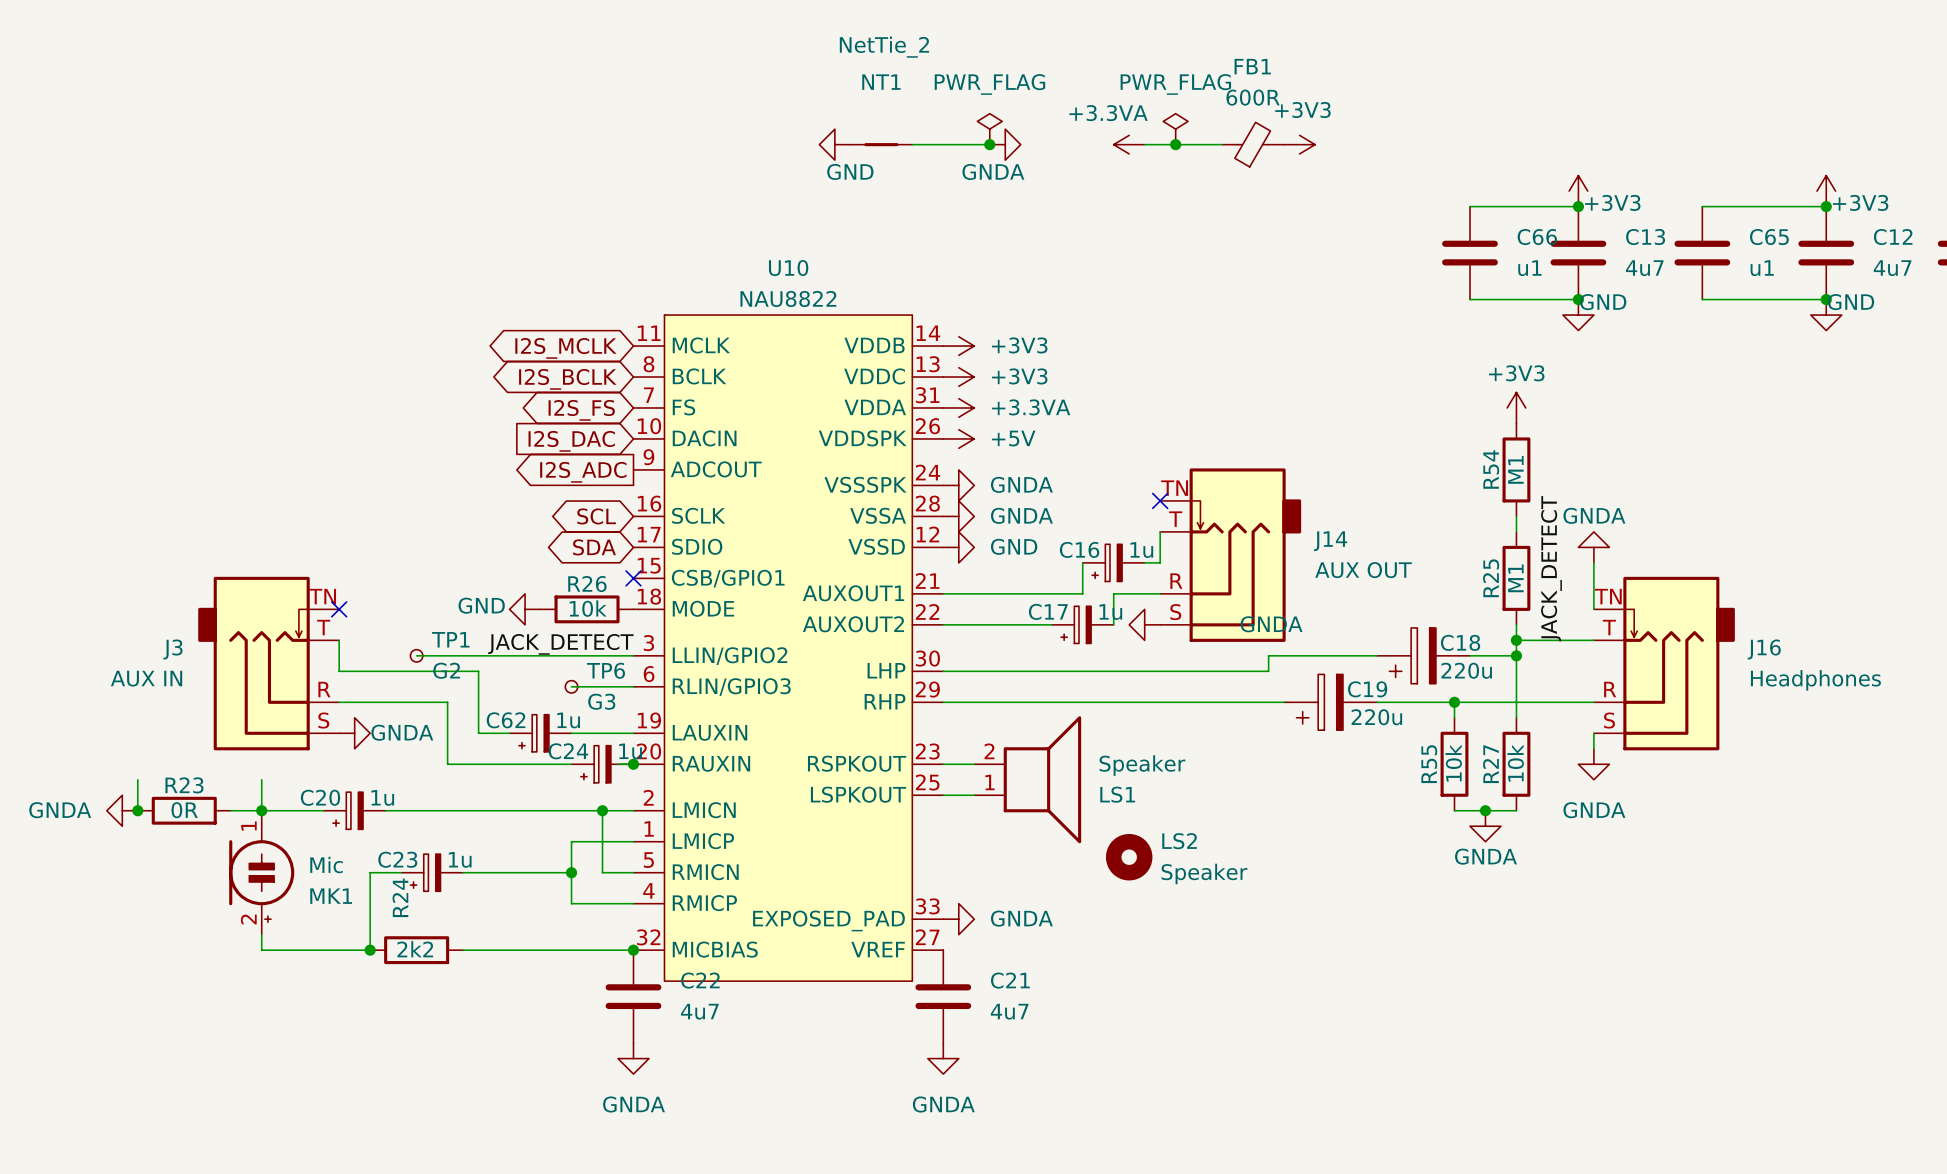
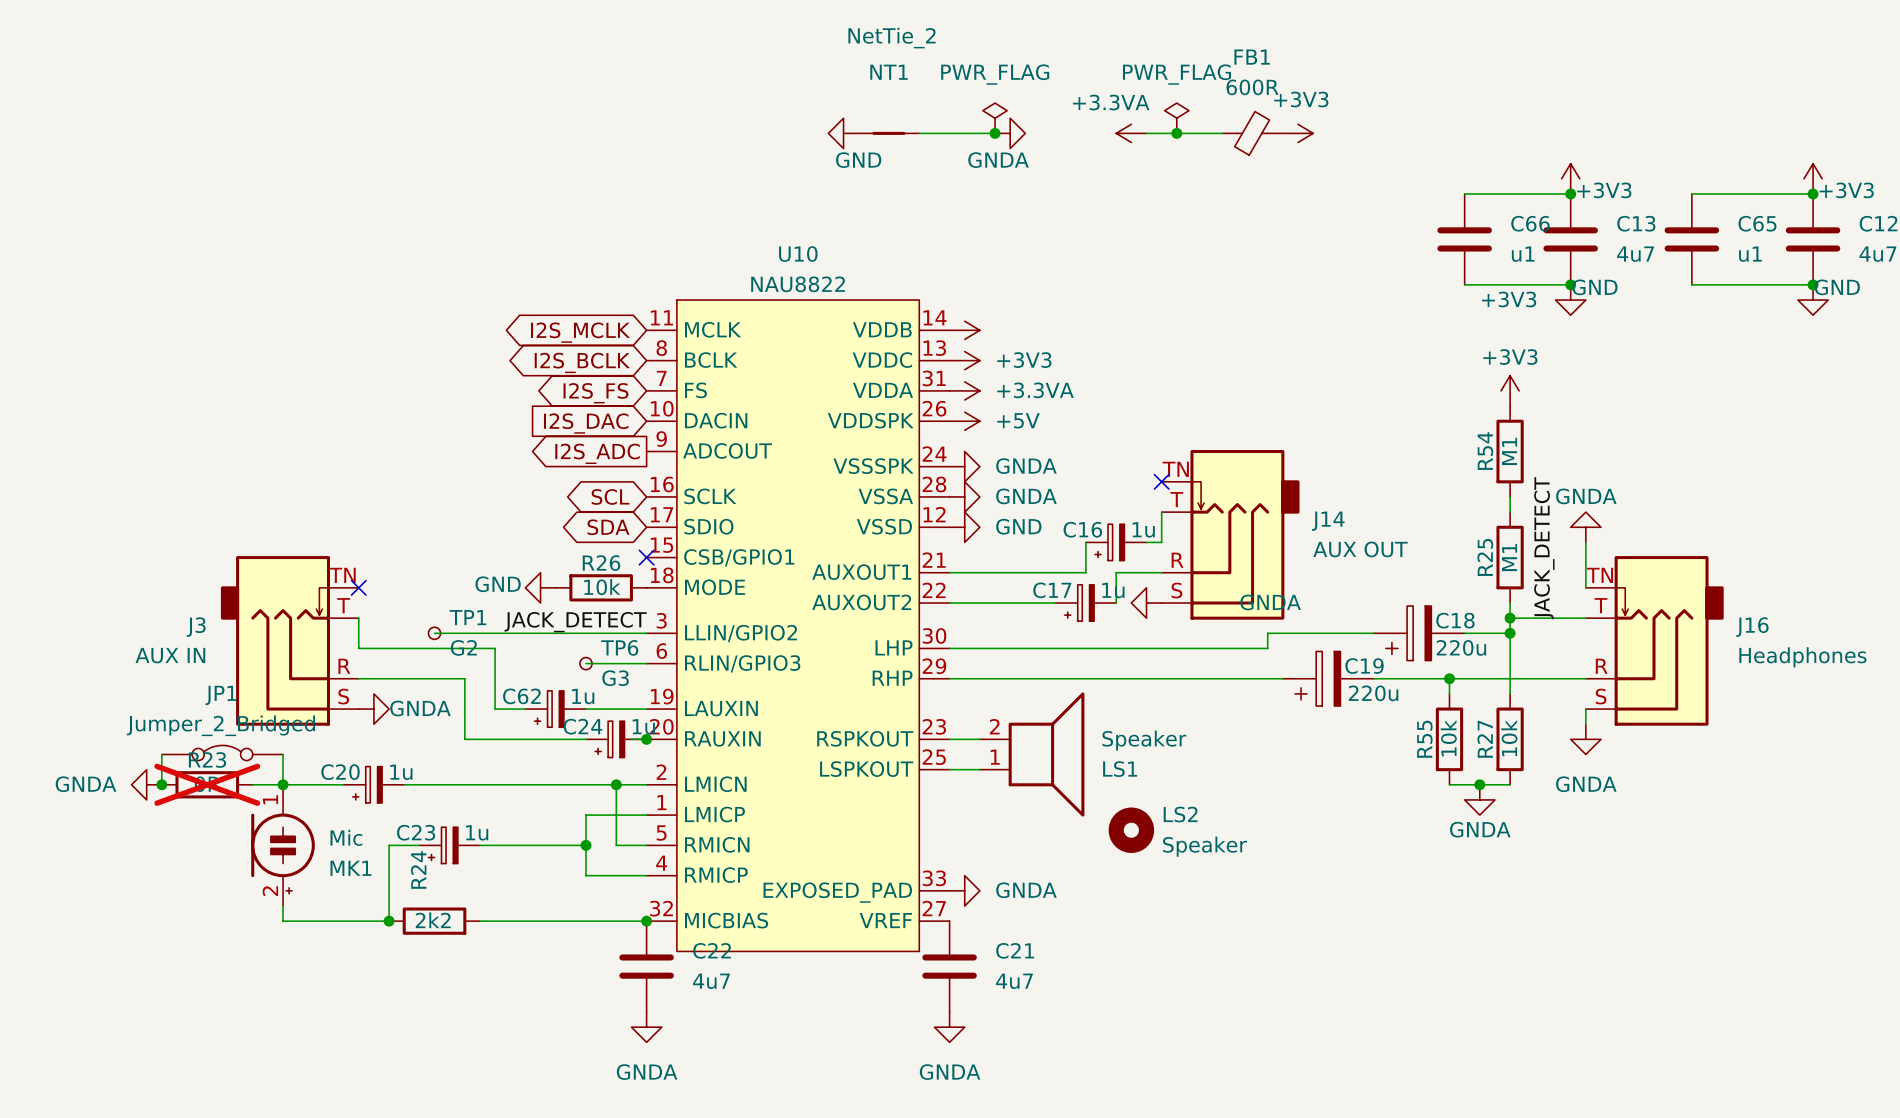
power symbol text position: +3V3 (1019, 345) -> +3V3 (1509, 299)
JP1: none -> Jumper_2_Bridged (222, 752)
R23 do-not-place cross: none -> (207, 784)

